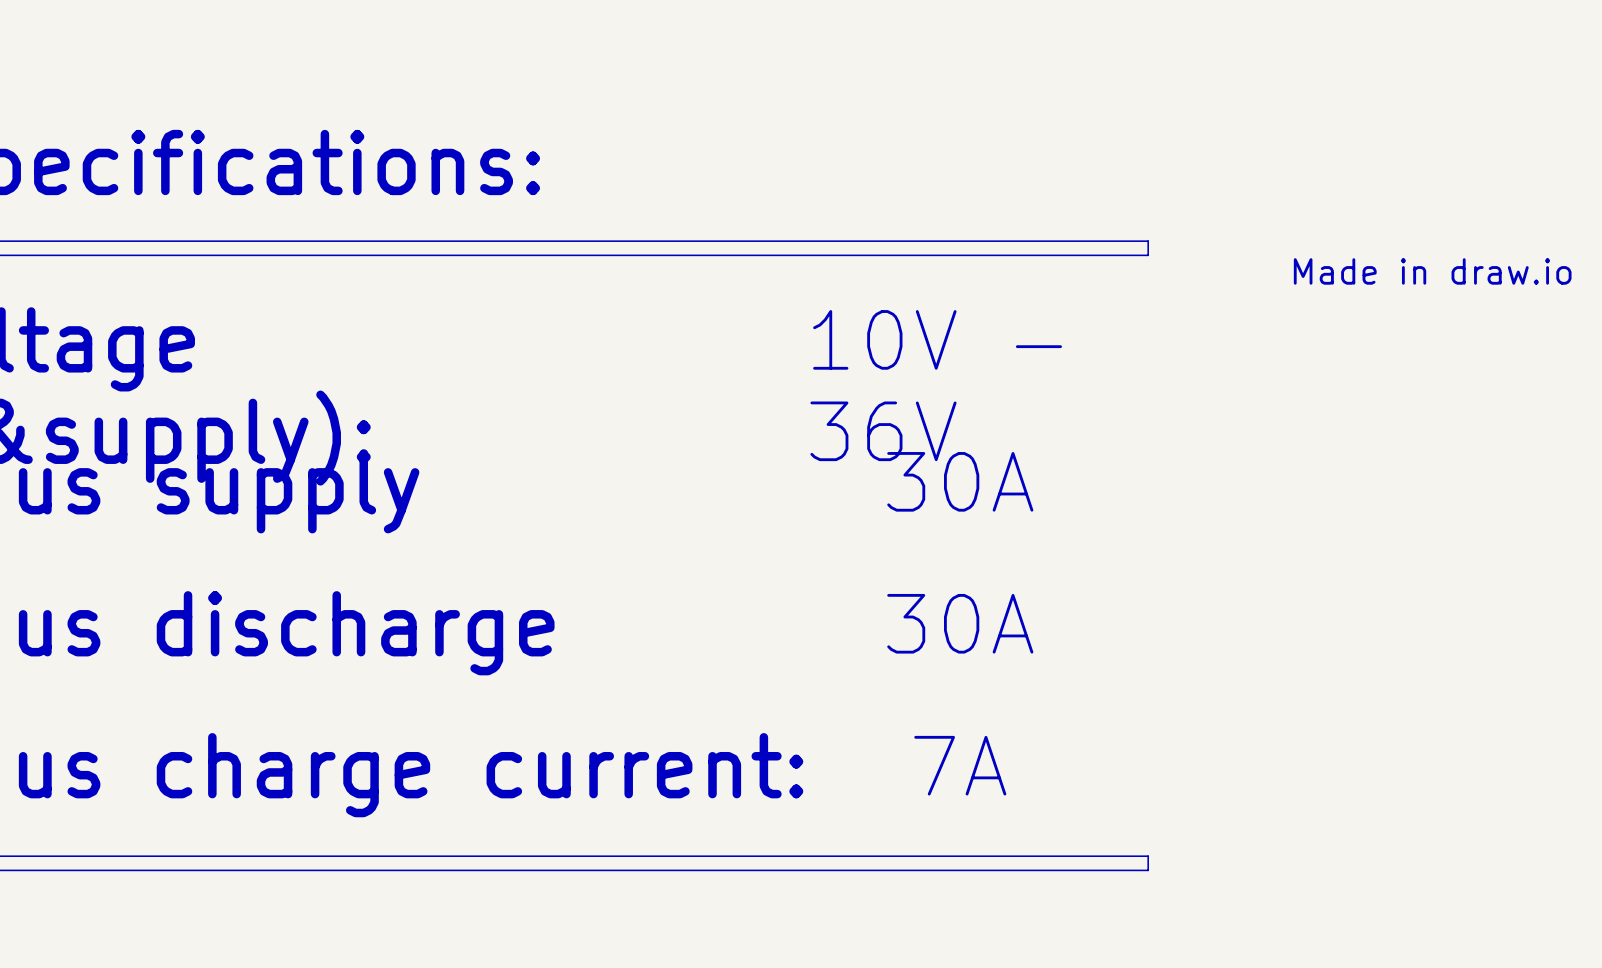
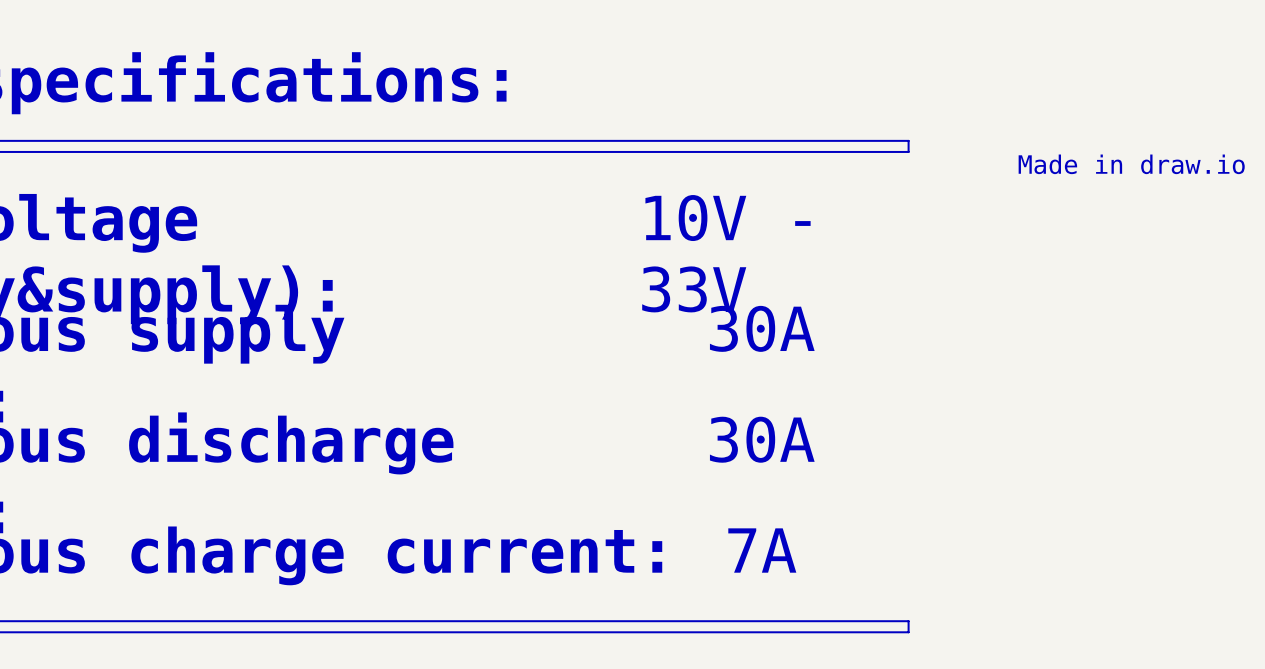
text: 36V (883, 431) -> 33V (694, 289)

